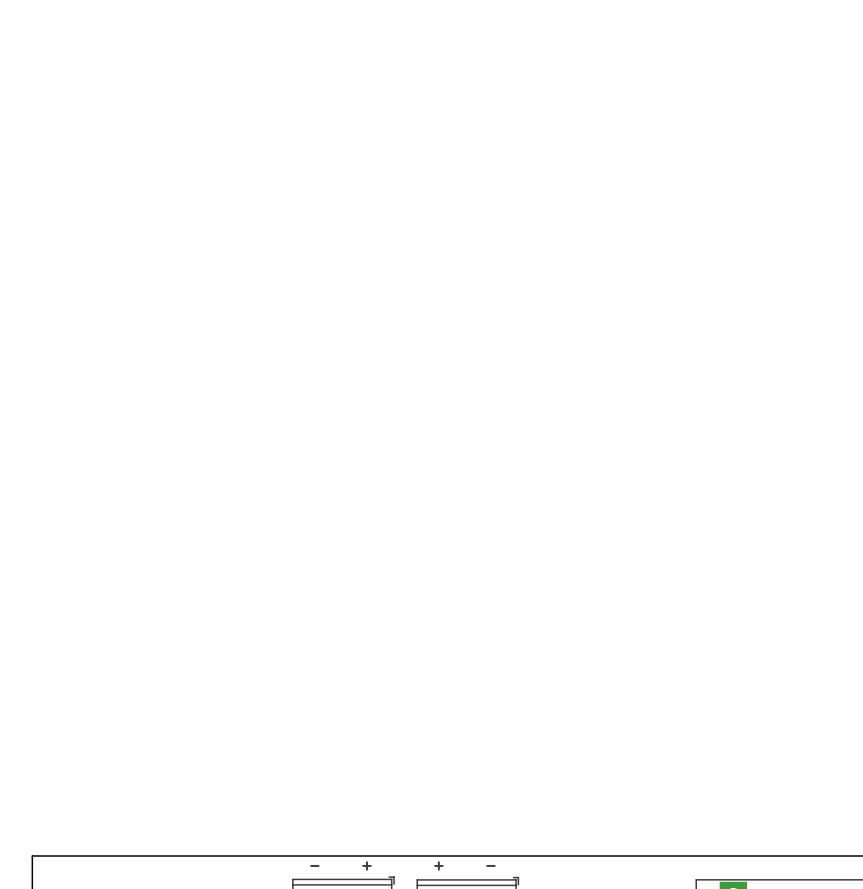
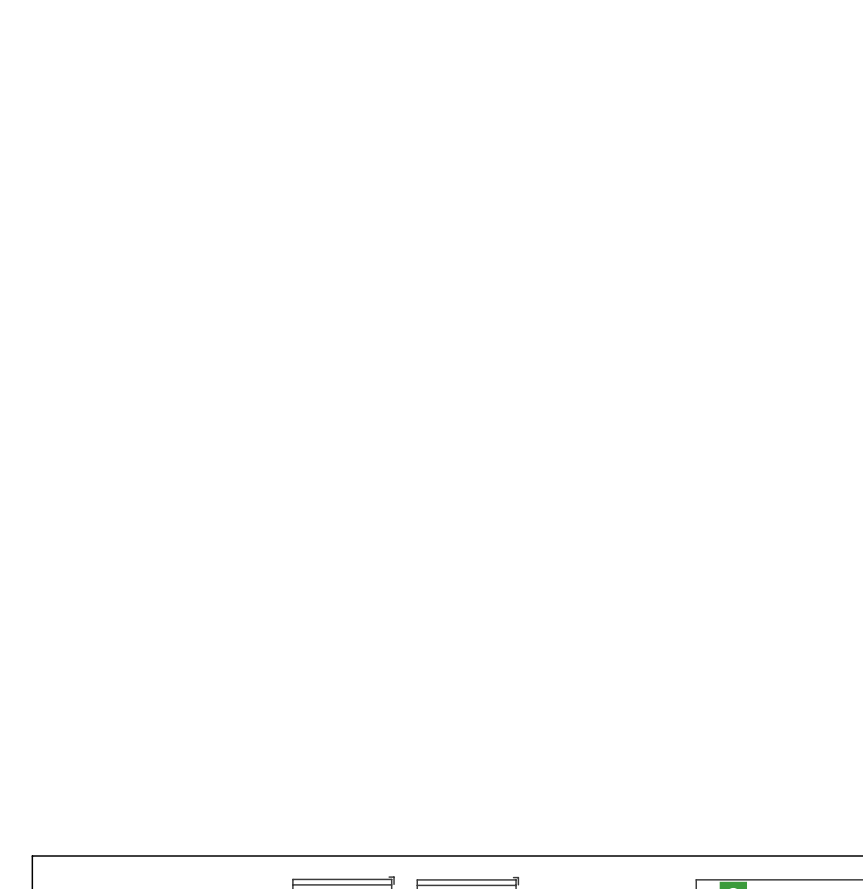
text: - (314, 865) -> none
text: + (366, 865) -> none
text: + (438, 865) -> none
text: - (490, 865) -> none

